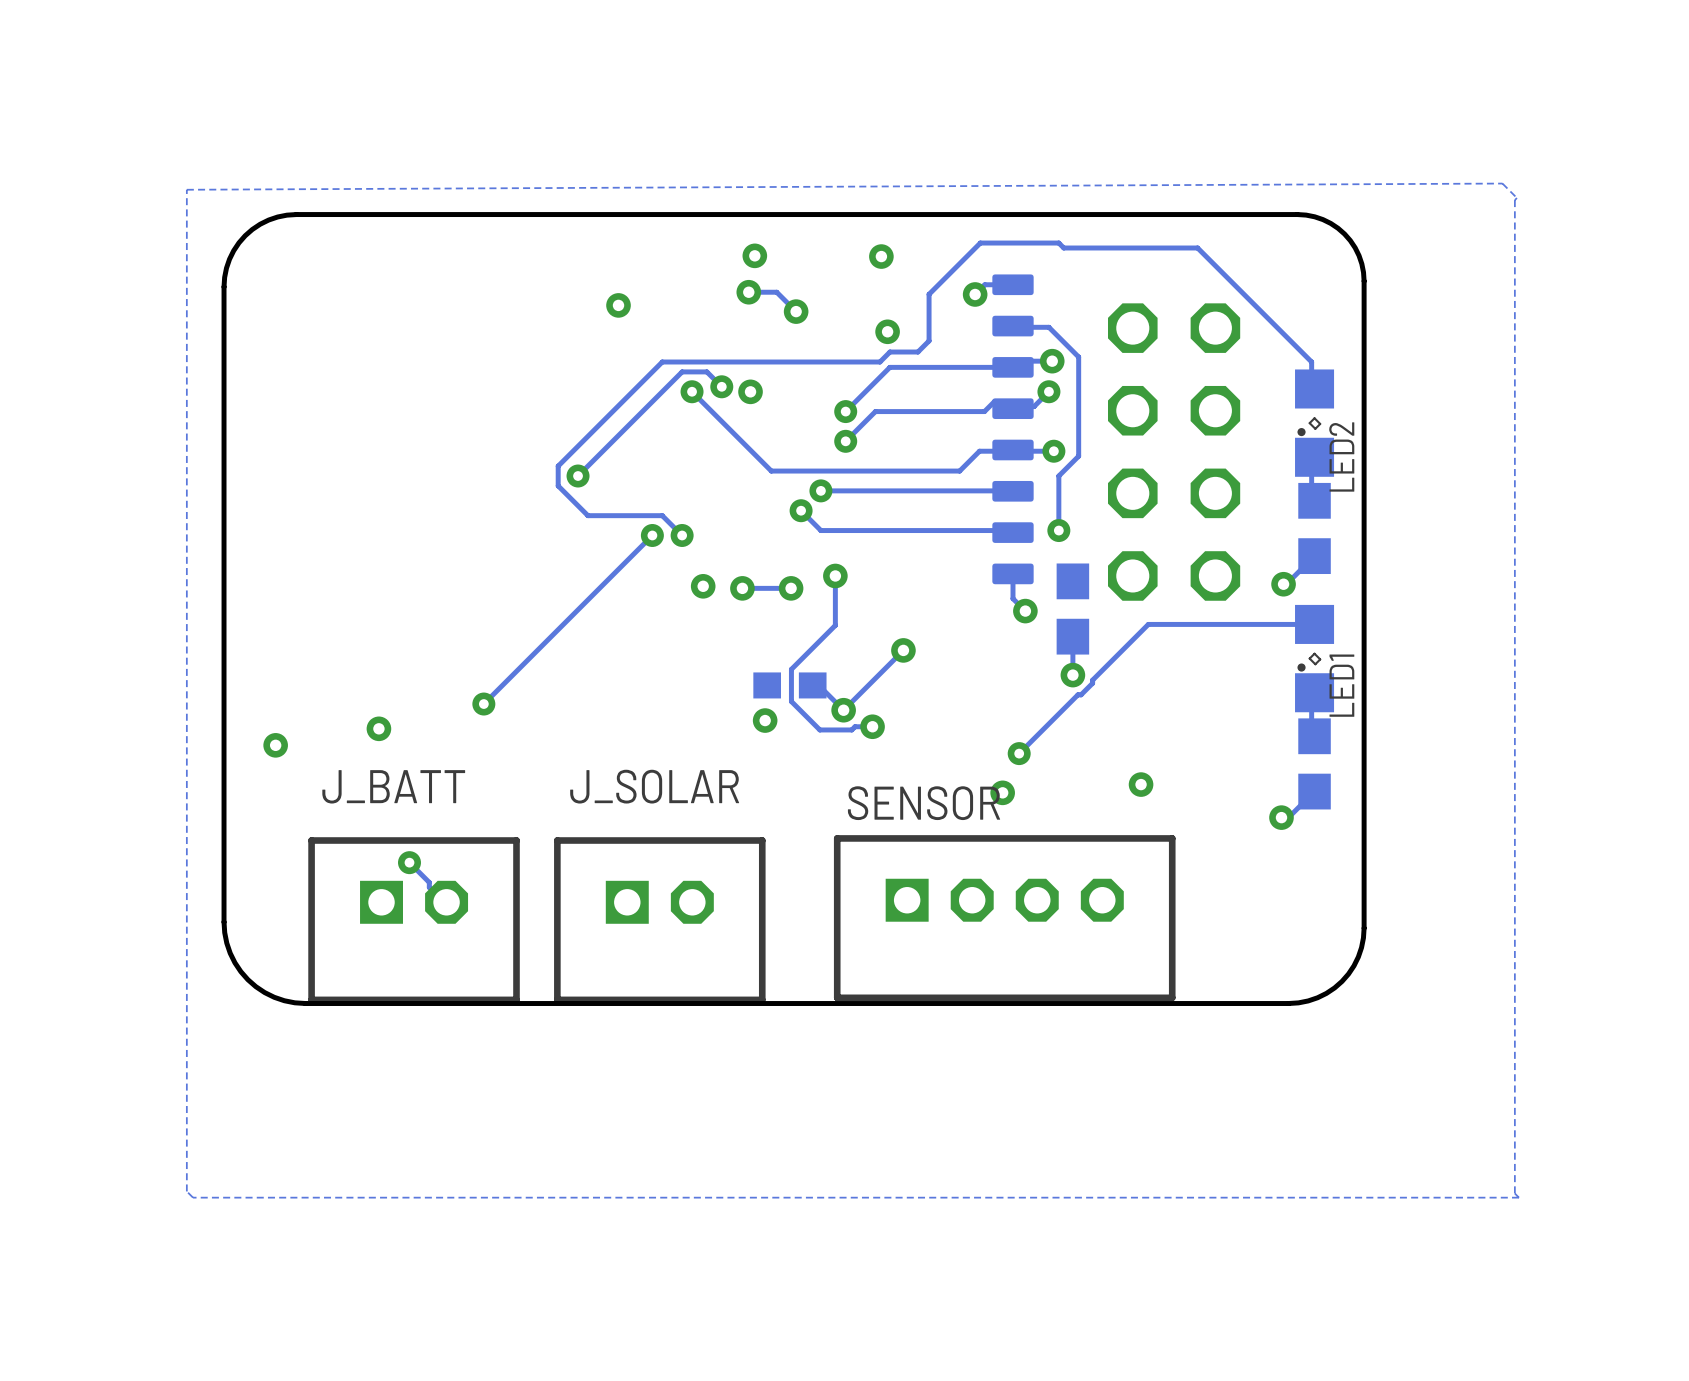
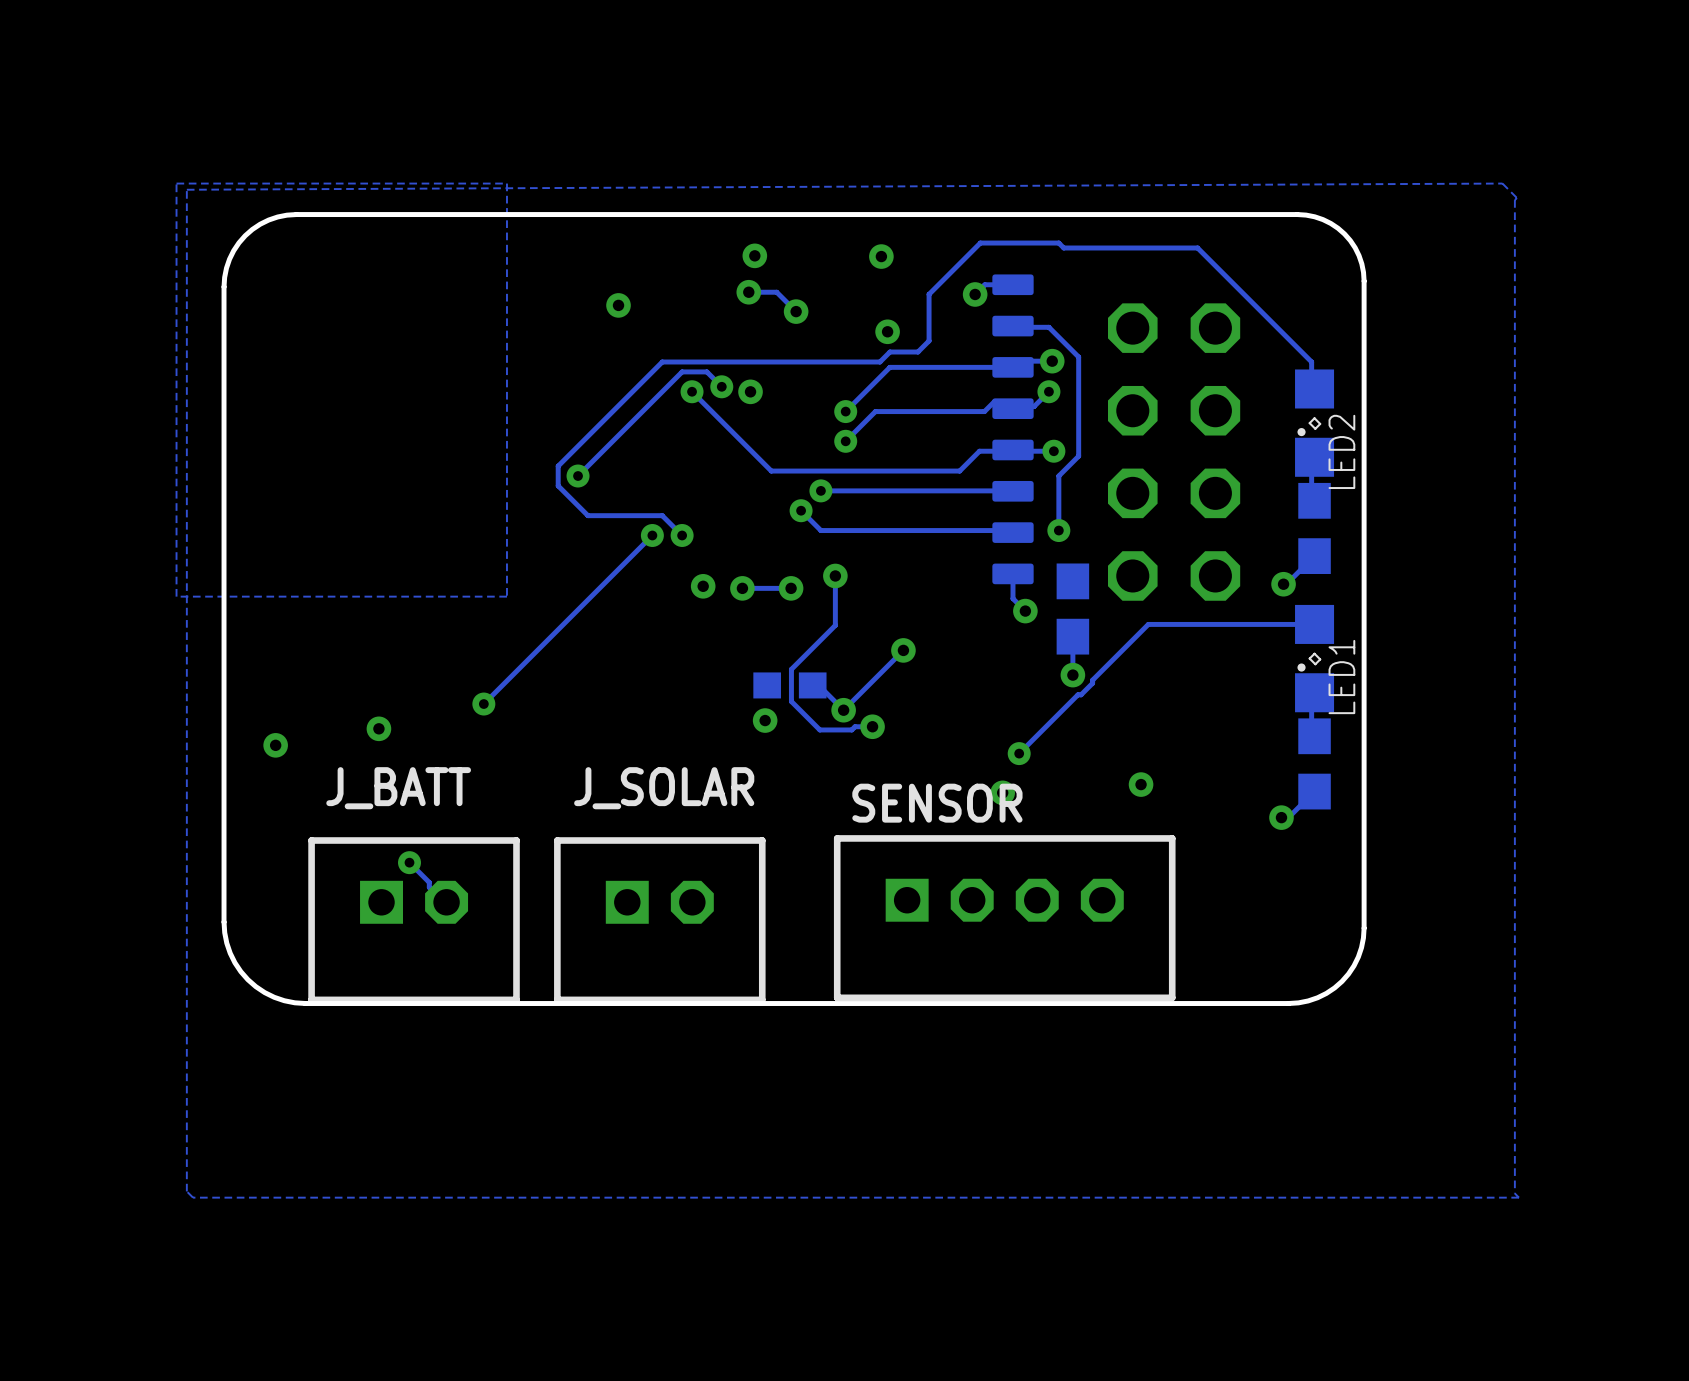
zone outline: none -> (506, 183) (506, 596) (176, 596) (176, 183) (506, 183)

